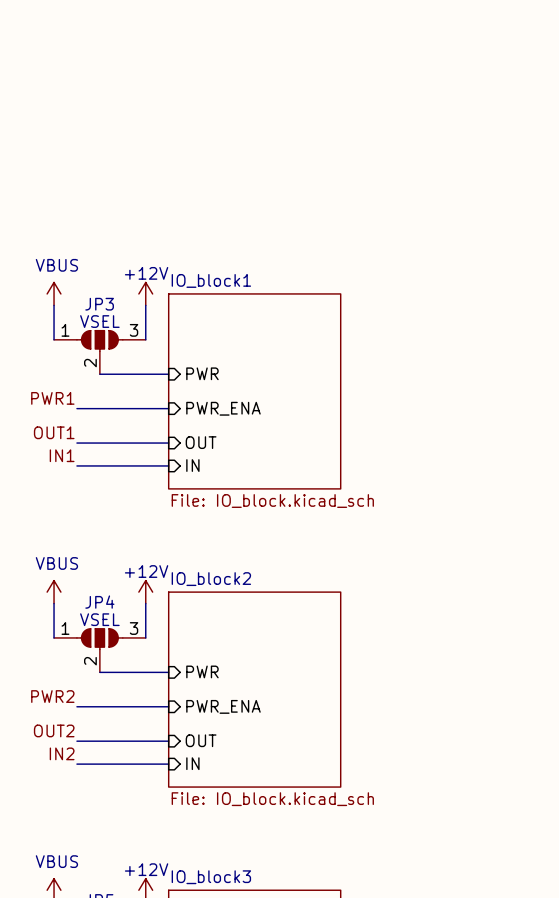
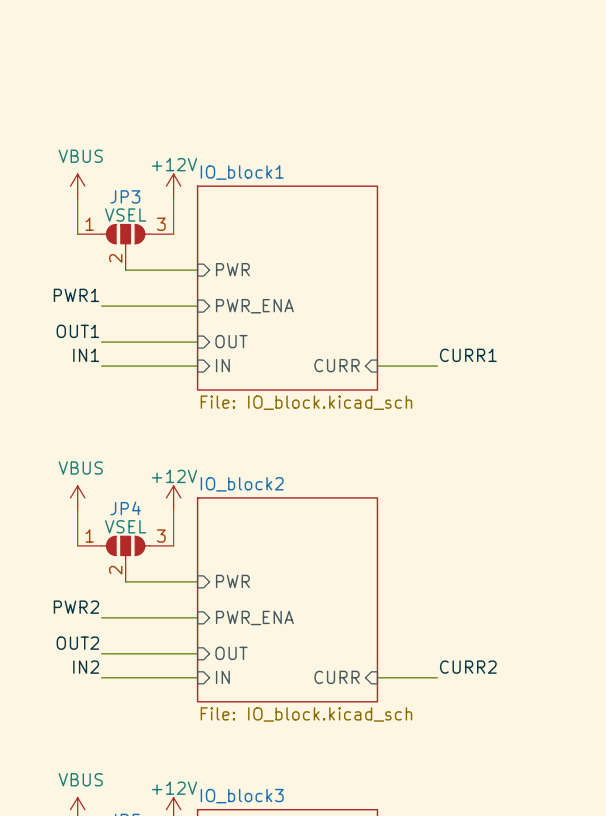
label: none -> CURR1 (468, 355)
sheet pin: none -> CURR (337, 365)
wire: none -> (377, 366) (437, 366)
label: none -> CURR2 (468, 667)
sheet pin: none -> CURR (337, 677)
wire: none -> (377, 677) (437, 677)

